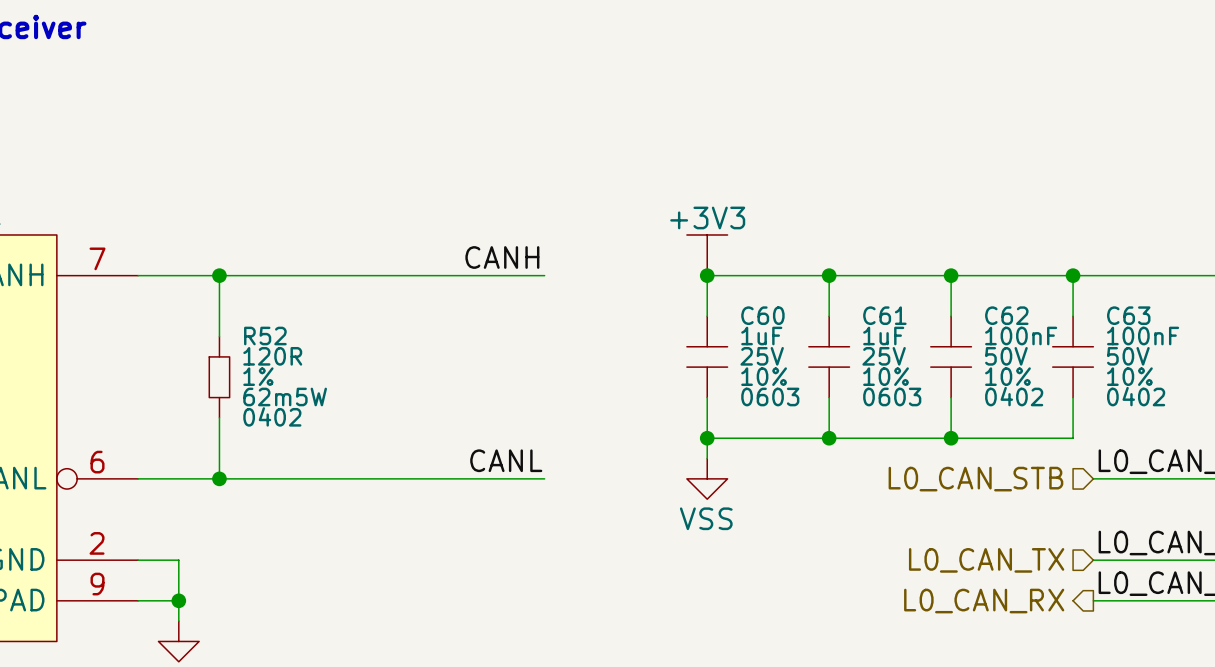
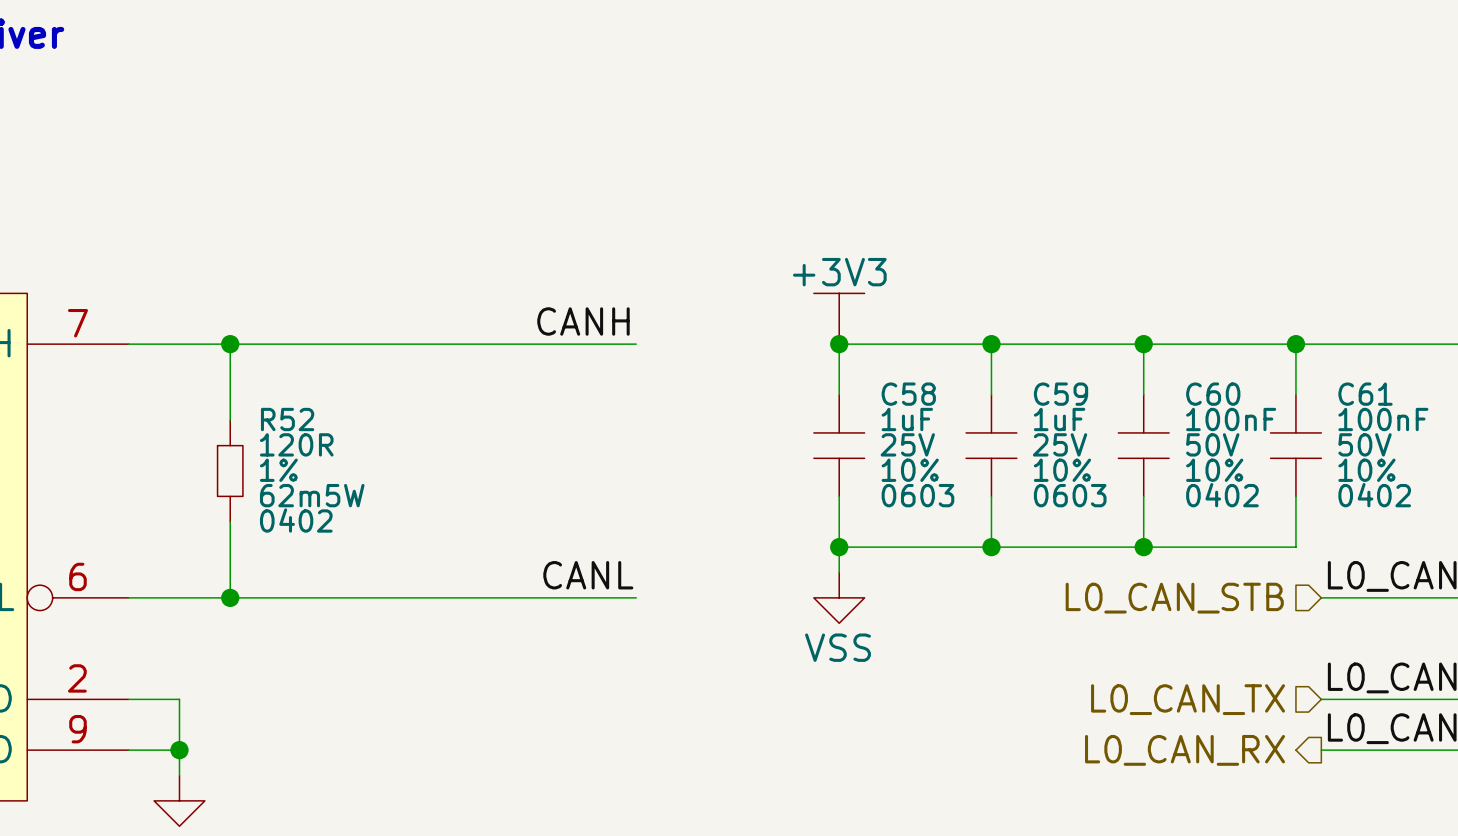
C60 name: C60 (762, 315) -> C58 (908, 394)
C61 name: C61 (884, 315) -> C59 (1061, 394)
C62 name: C62 (1006, 315) -> C60 (1213, 394)
C63 name: C63 (1128, 315) -> C61 (1365, 394)

